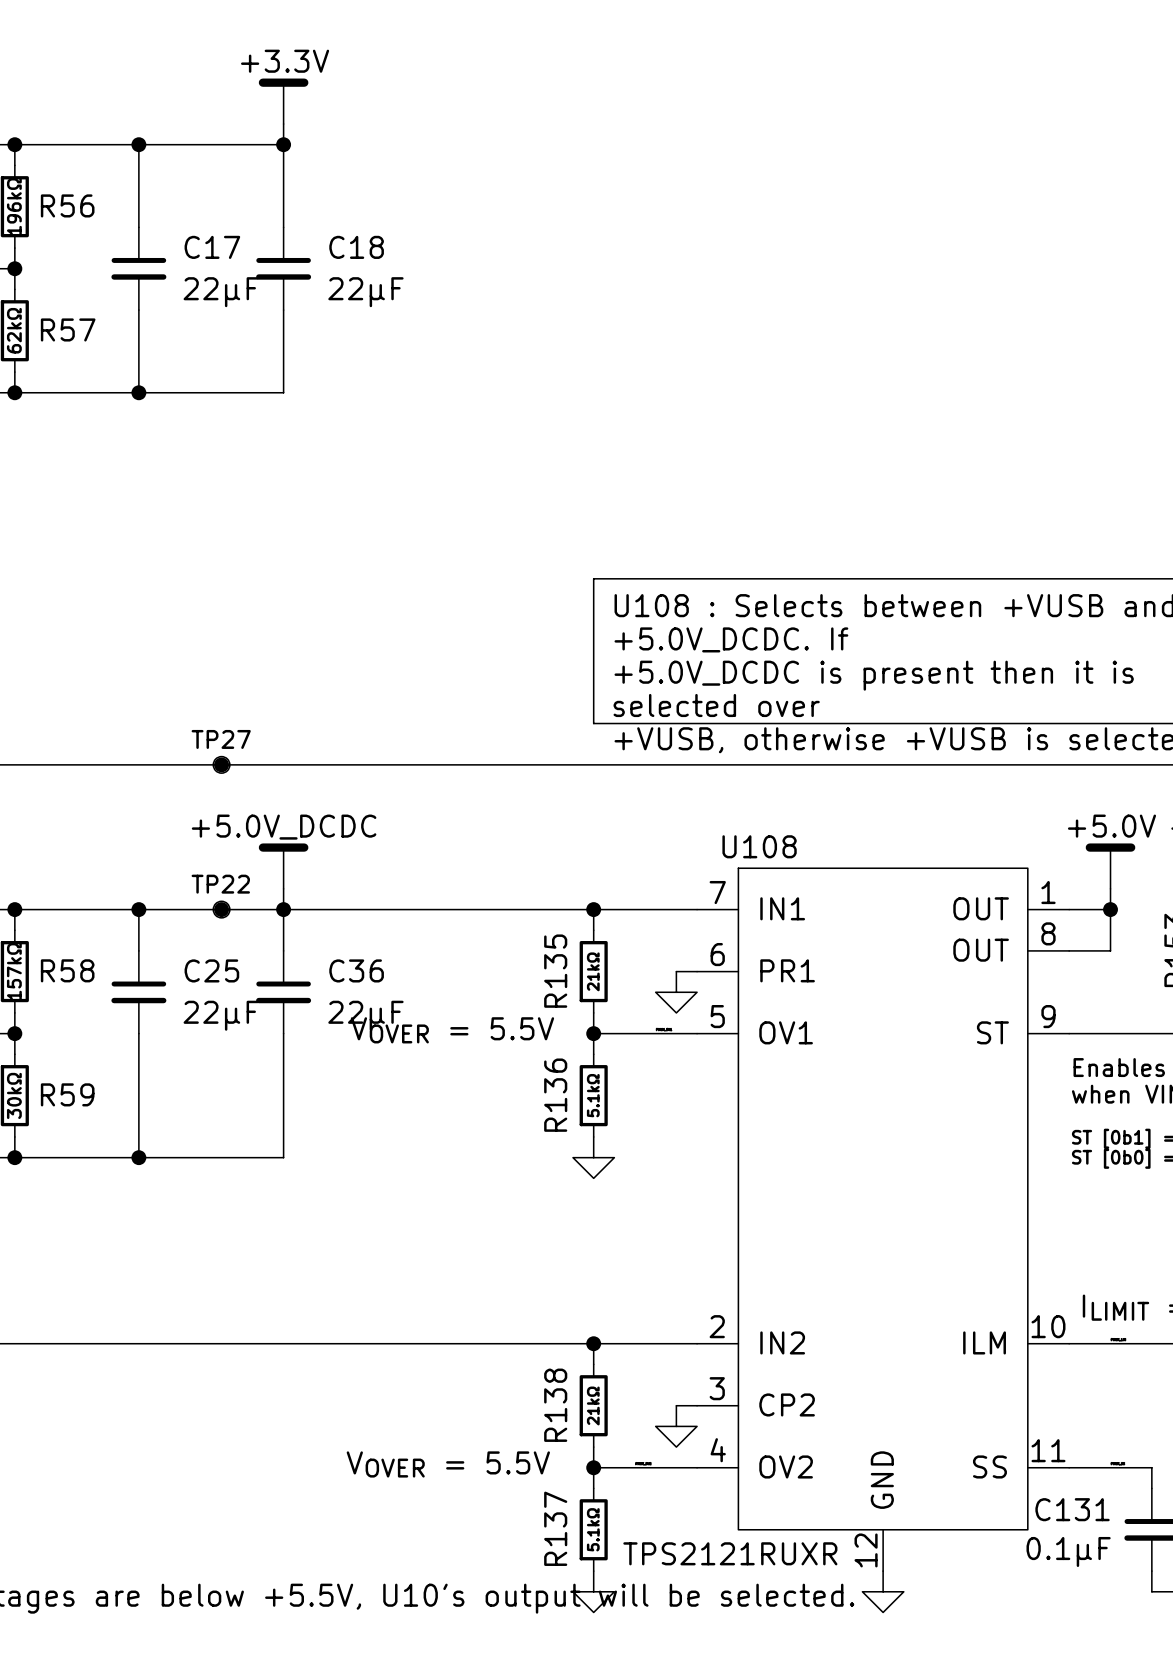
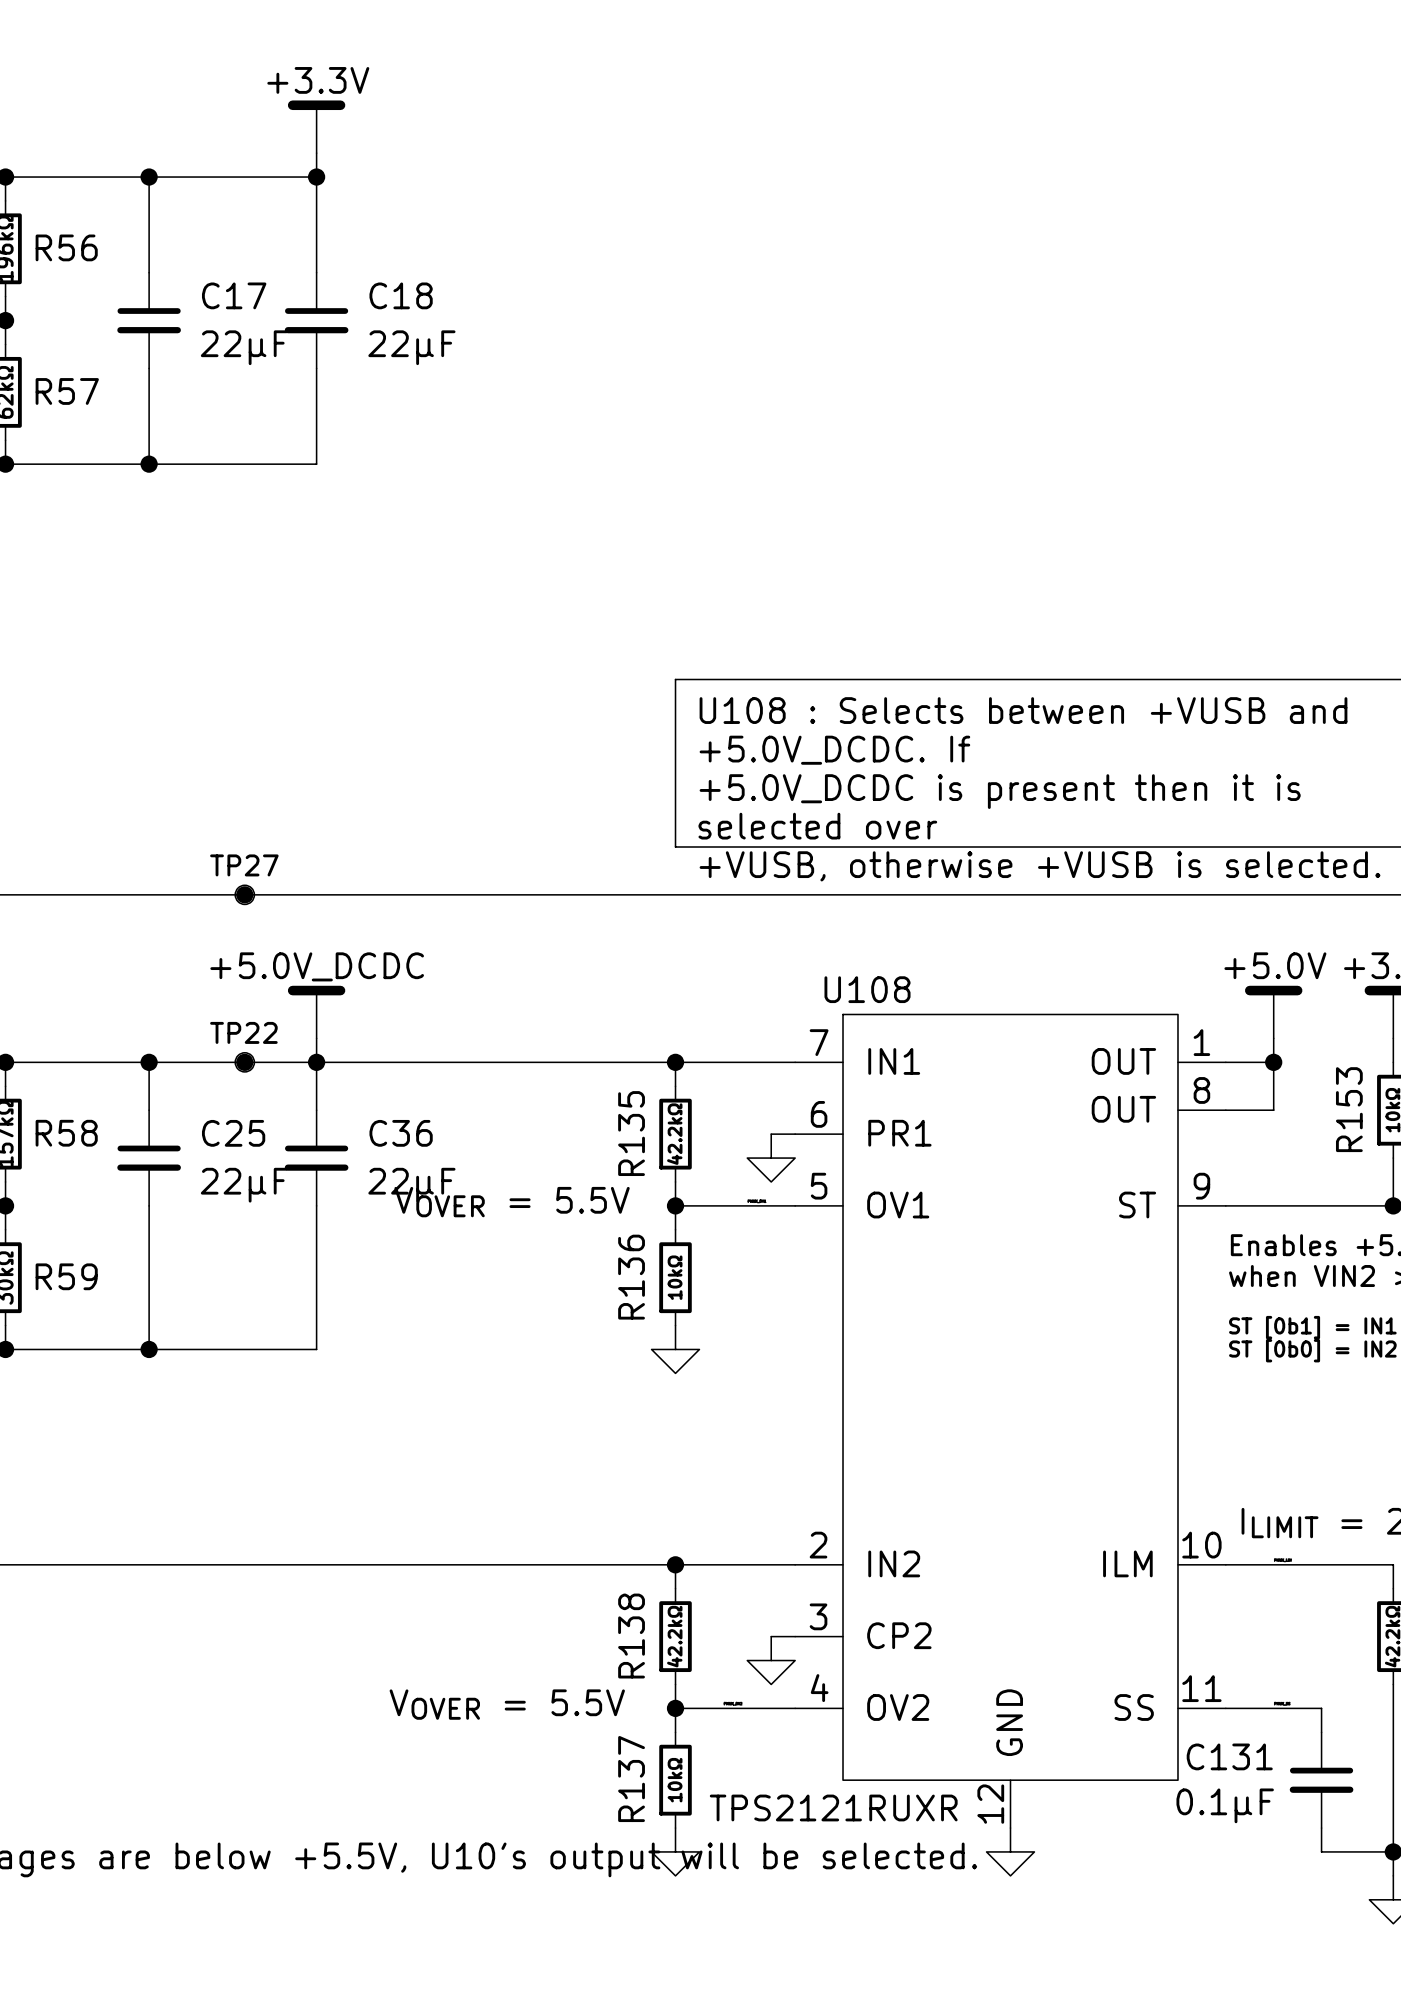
R135 value: 21kΩ (593, 971) -> 42.2kΩ (674, 1134)
R136 value: 5.1kΩ (593, 1095) -> 10kΩ (675, 1277)
R138 value: 21kΩ (593, 1405) -> 42.2kΩ (674, 1636)
R137 value: 5.1kΩ (593, 1529) -> 10kΩ (675, 1780)

